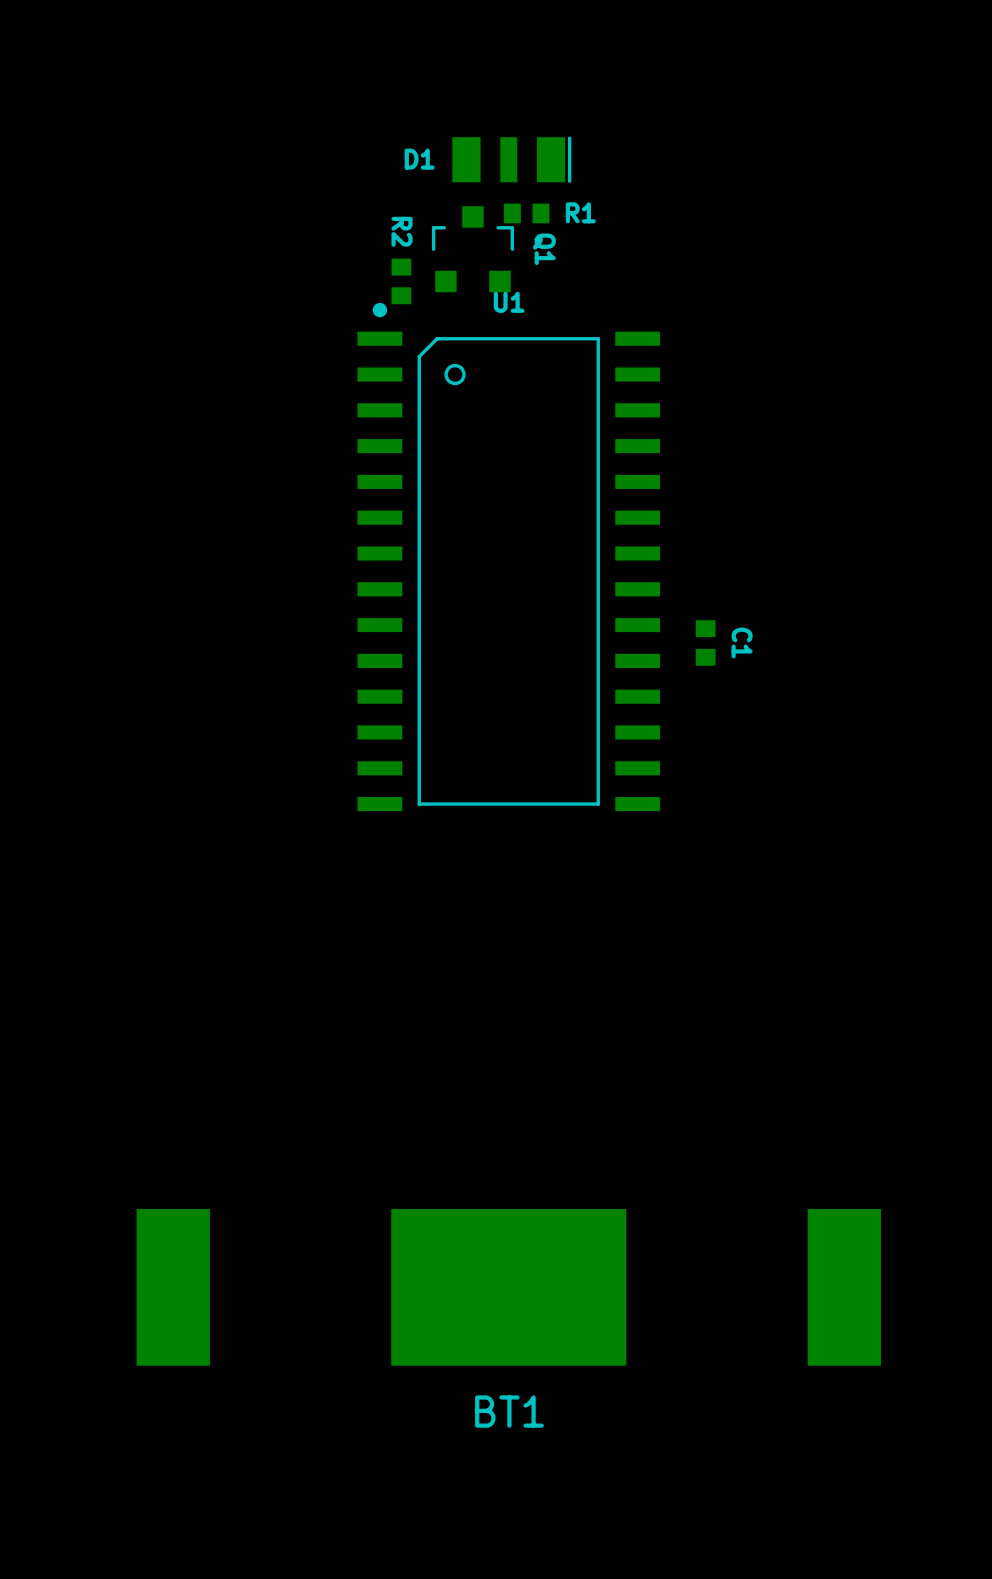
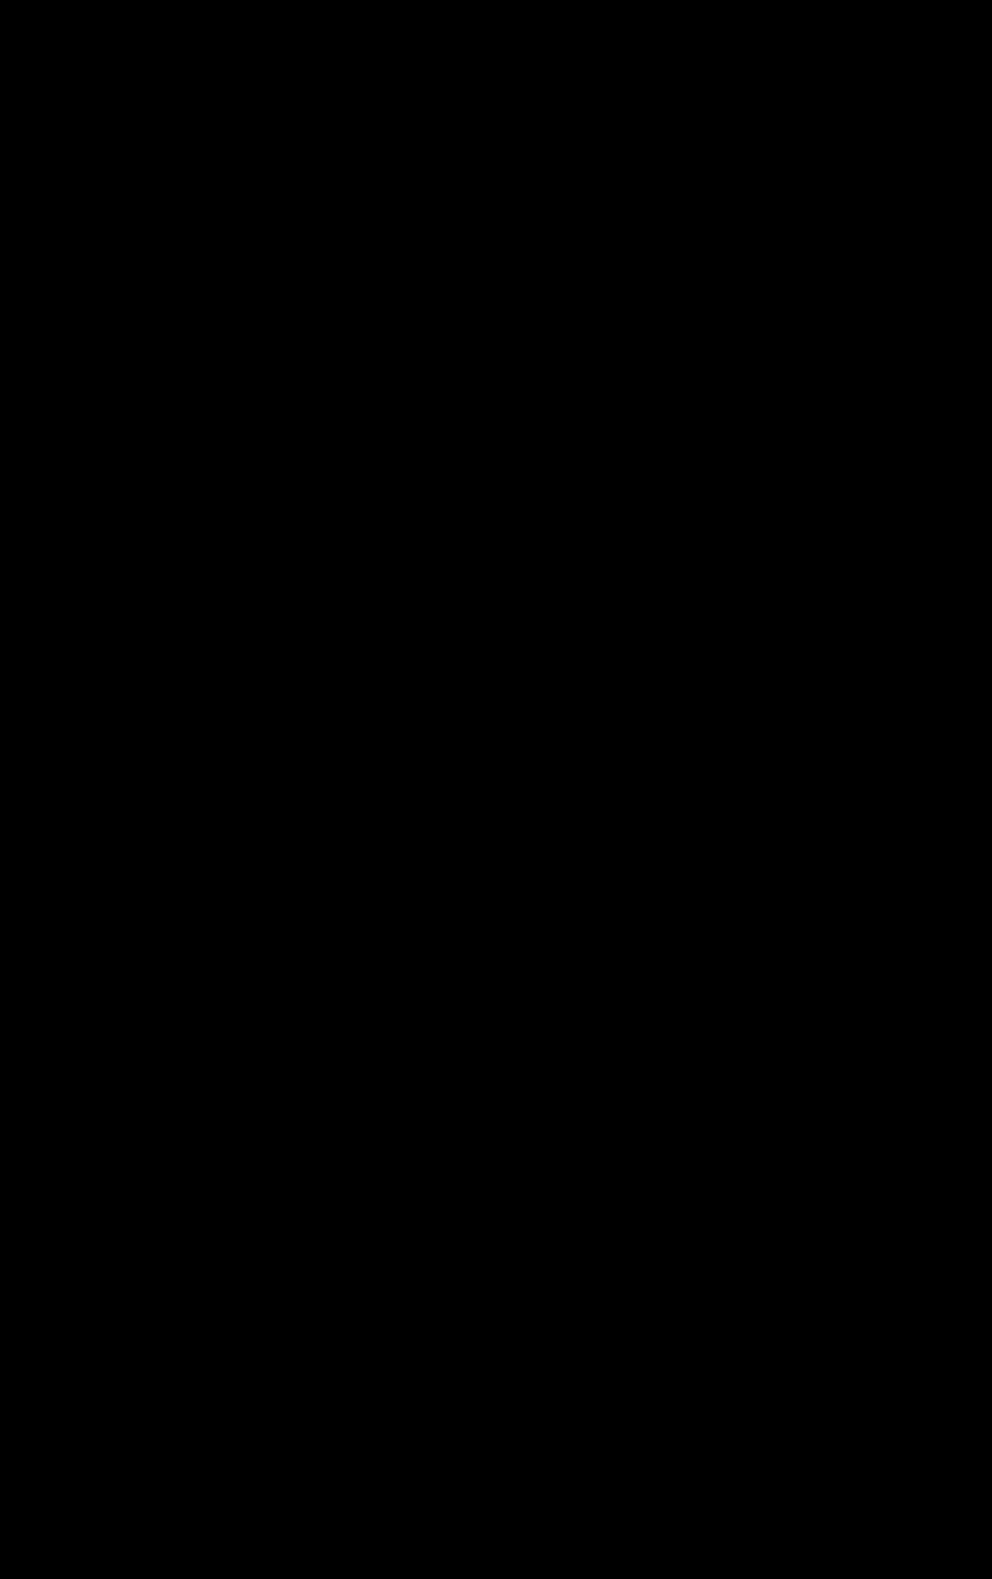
D1: (511, 159) -> none
R1: (526, 213) -> none
Q1: (472, 249) -> none
R2: (401, 281) -> none
U1: (508, 557) -> none
C1: (705, 642) -> none
BT1: (508, 1287) -> none

